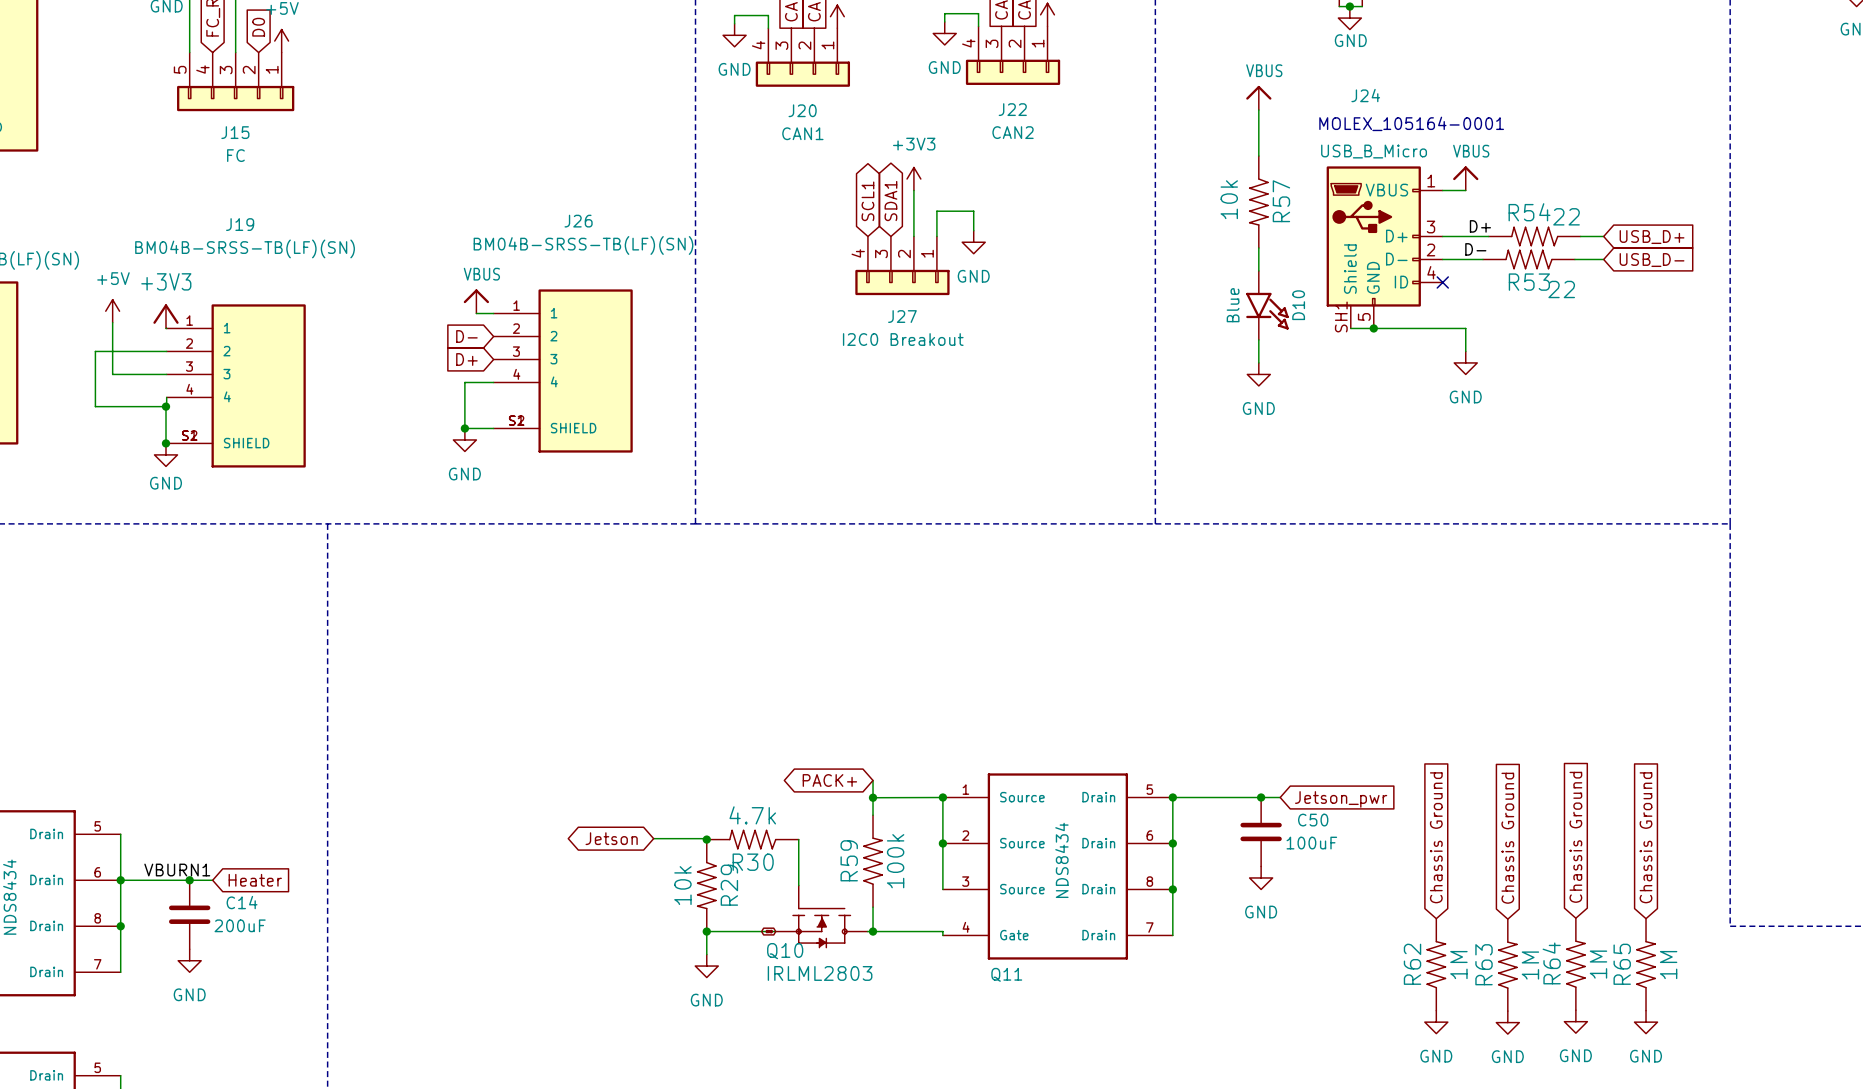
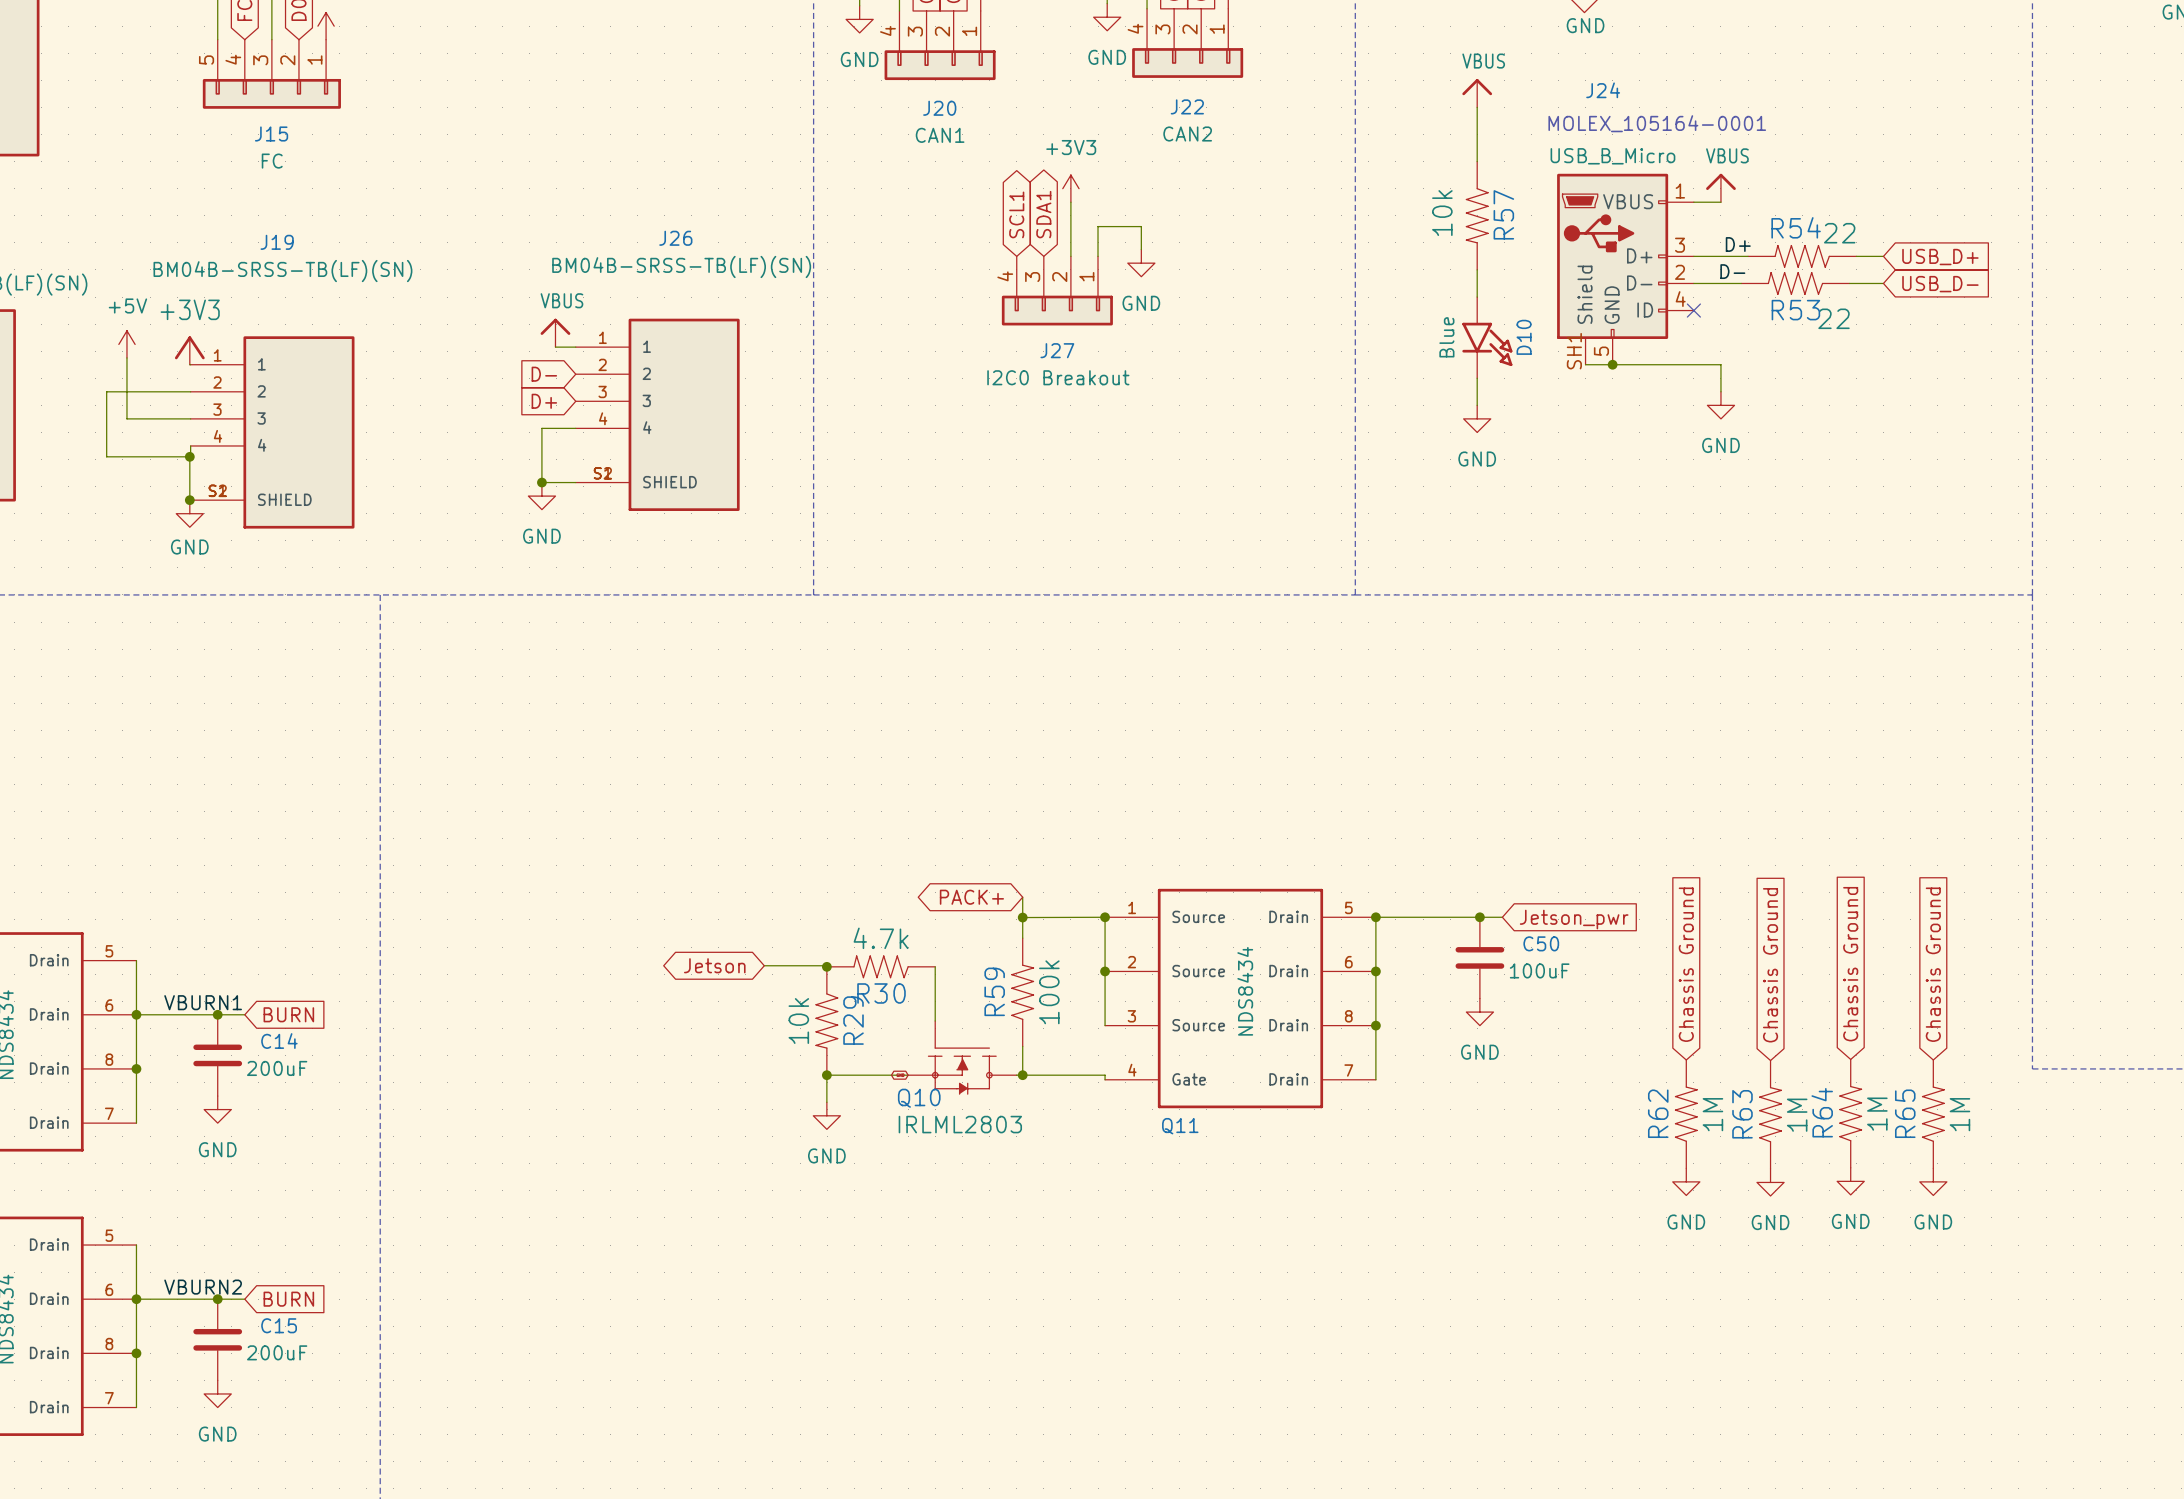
global label: Heater (255, 880) -> BURN (288, 1014)

